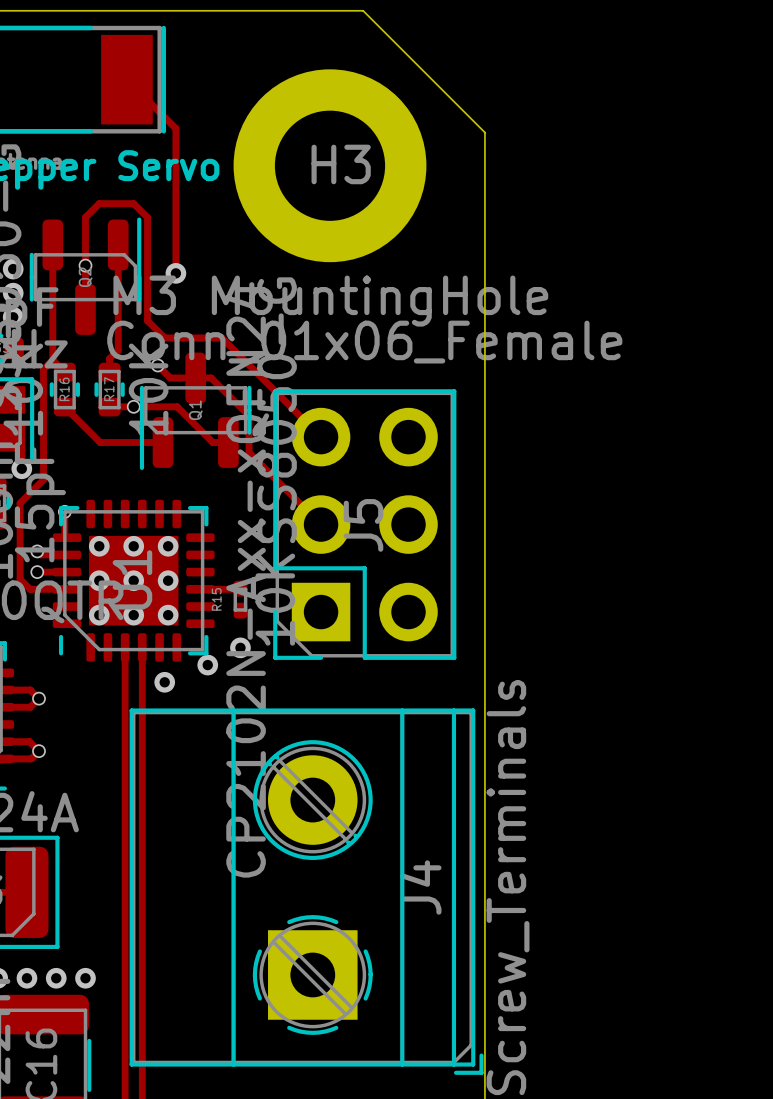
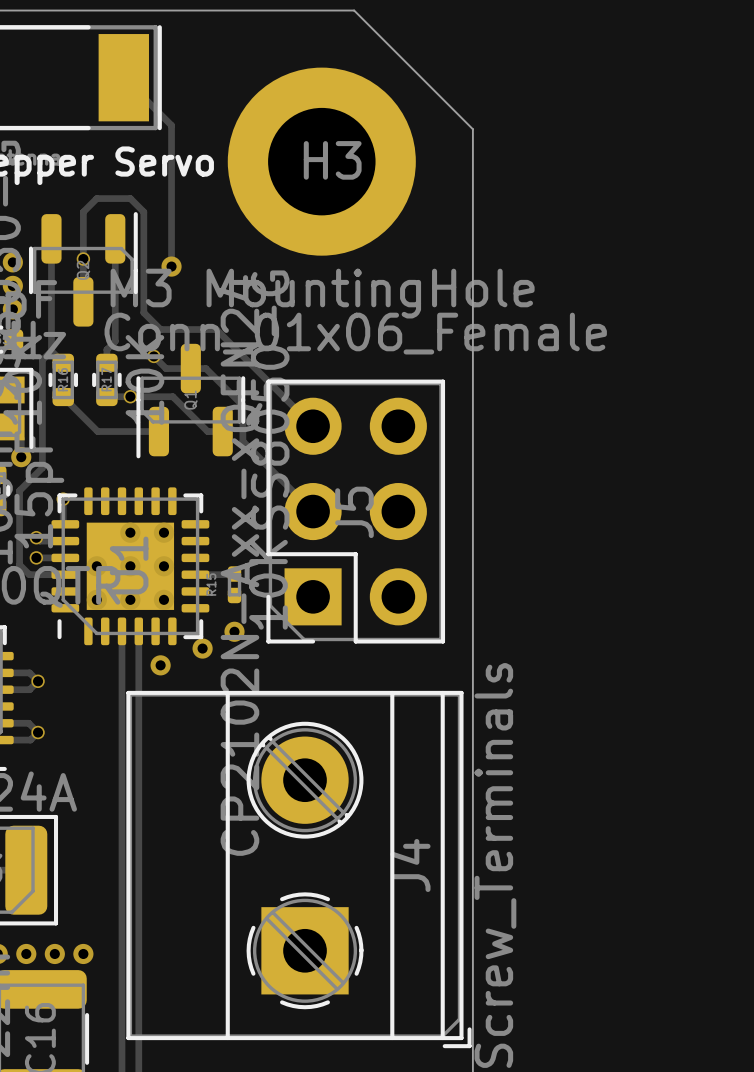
via: (99, 546) -> none

